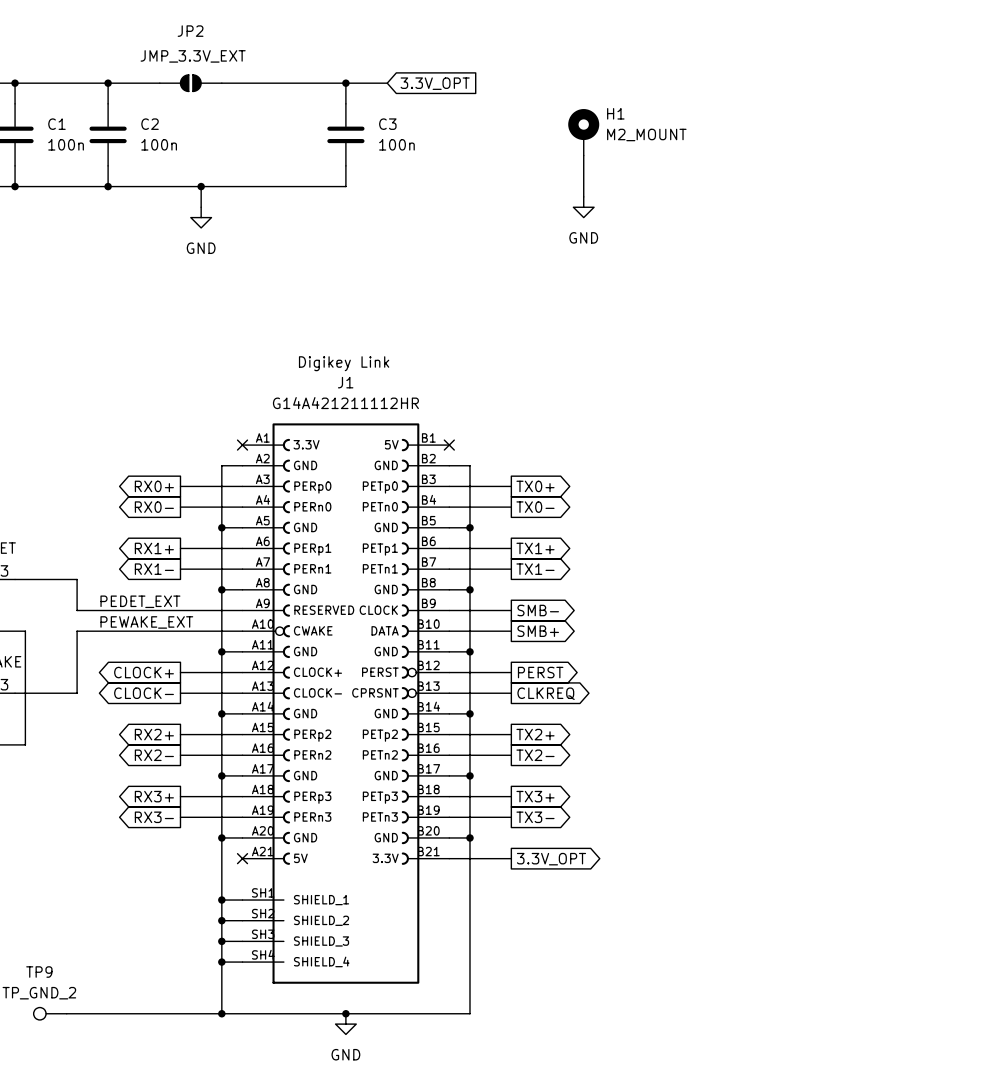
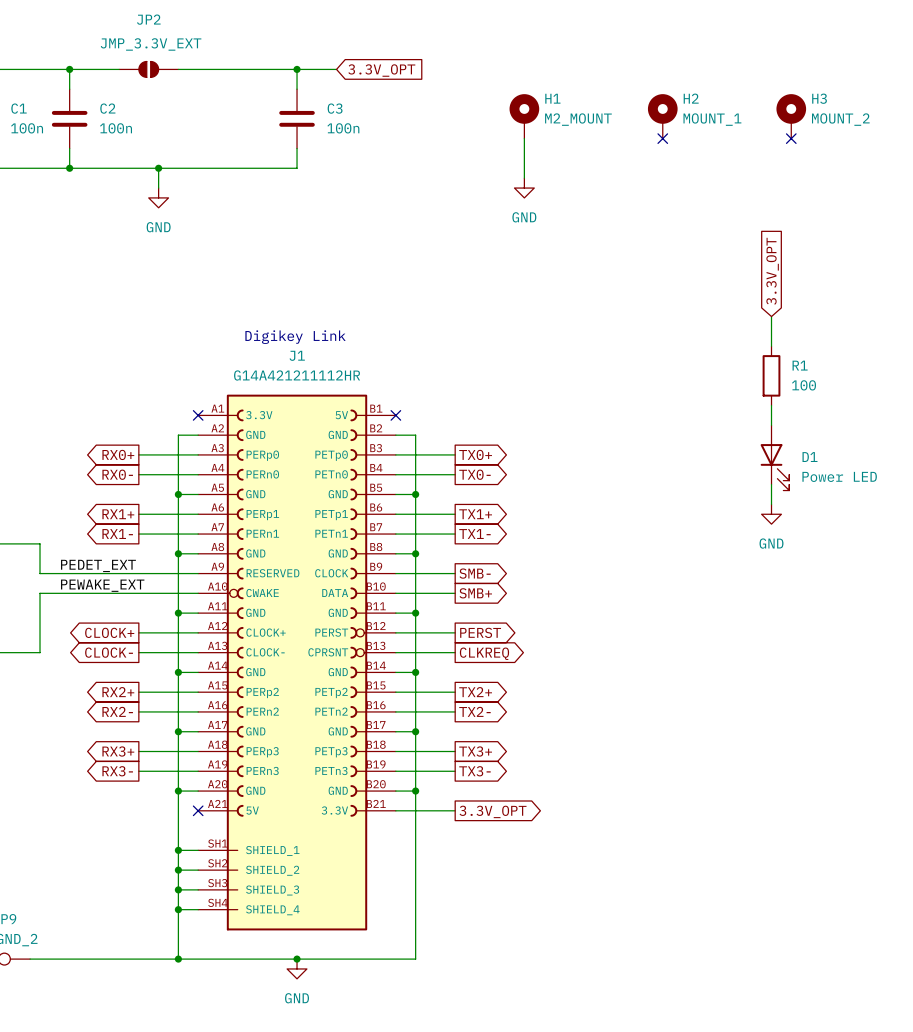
H2: none -> MOUNT_1 (662, 116)
H3: none -> MOUNT_2 (791, 116)
no-connect mark: none -> (662, 138)
no-connect mark: none -> (791, 138)
global label: none -> 3.3V_OPT (772, 271)
wire: none -> (771, 316) (771, 346)
R1: none -> 100 (771, 375)
wire: none -> (771, 405) (771, 425)
D1: none -> Power LED (774, 457)
wire: none -> (771, 484) (771, 504)
power symbol: none -> GND (771, 514)

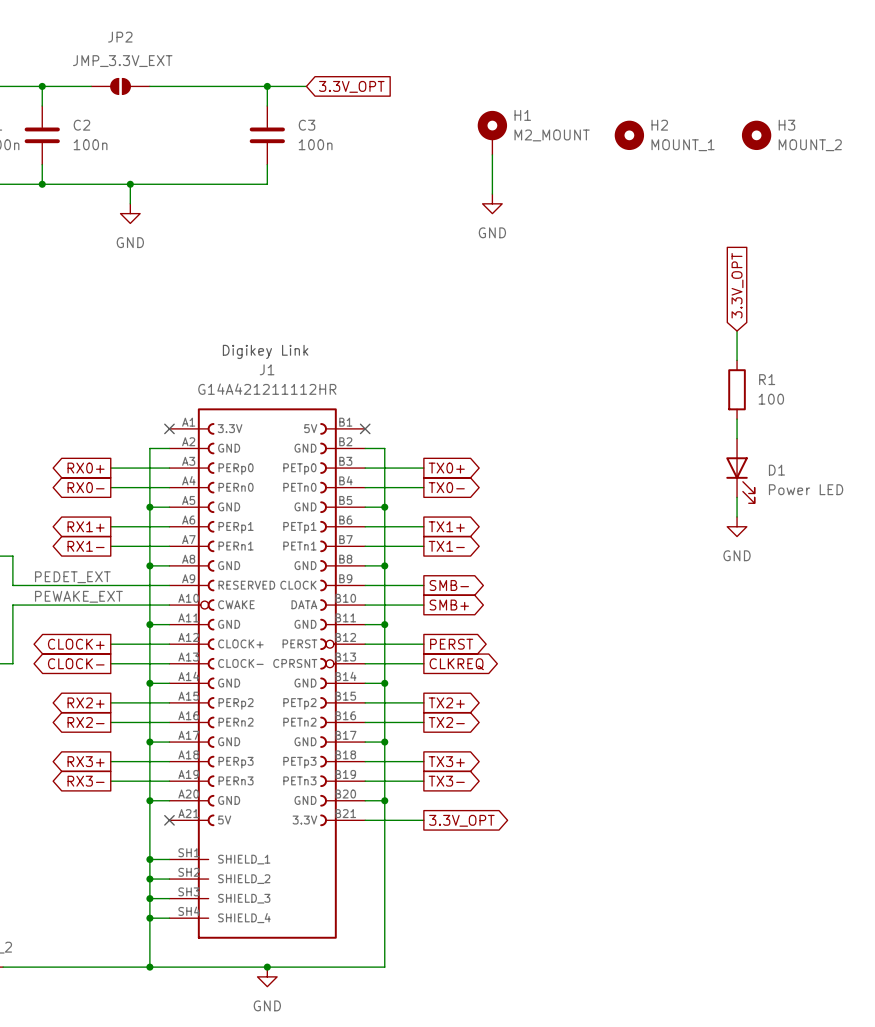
H2 symbol: [647, 94, 678, 139] -> [614, 120, 645, 151]
H3 symbol: [776, 94, 807, 139] -> [741, 120, 772, 151]
no-connect mark: (662, 138) -> none
no-connect mark: (791, 138) -> none

